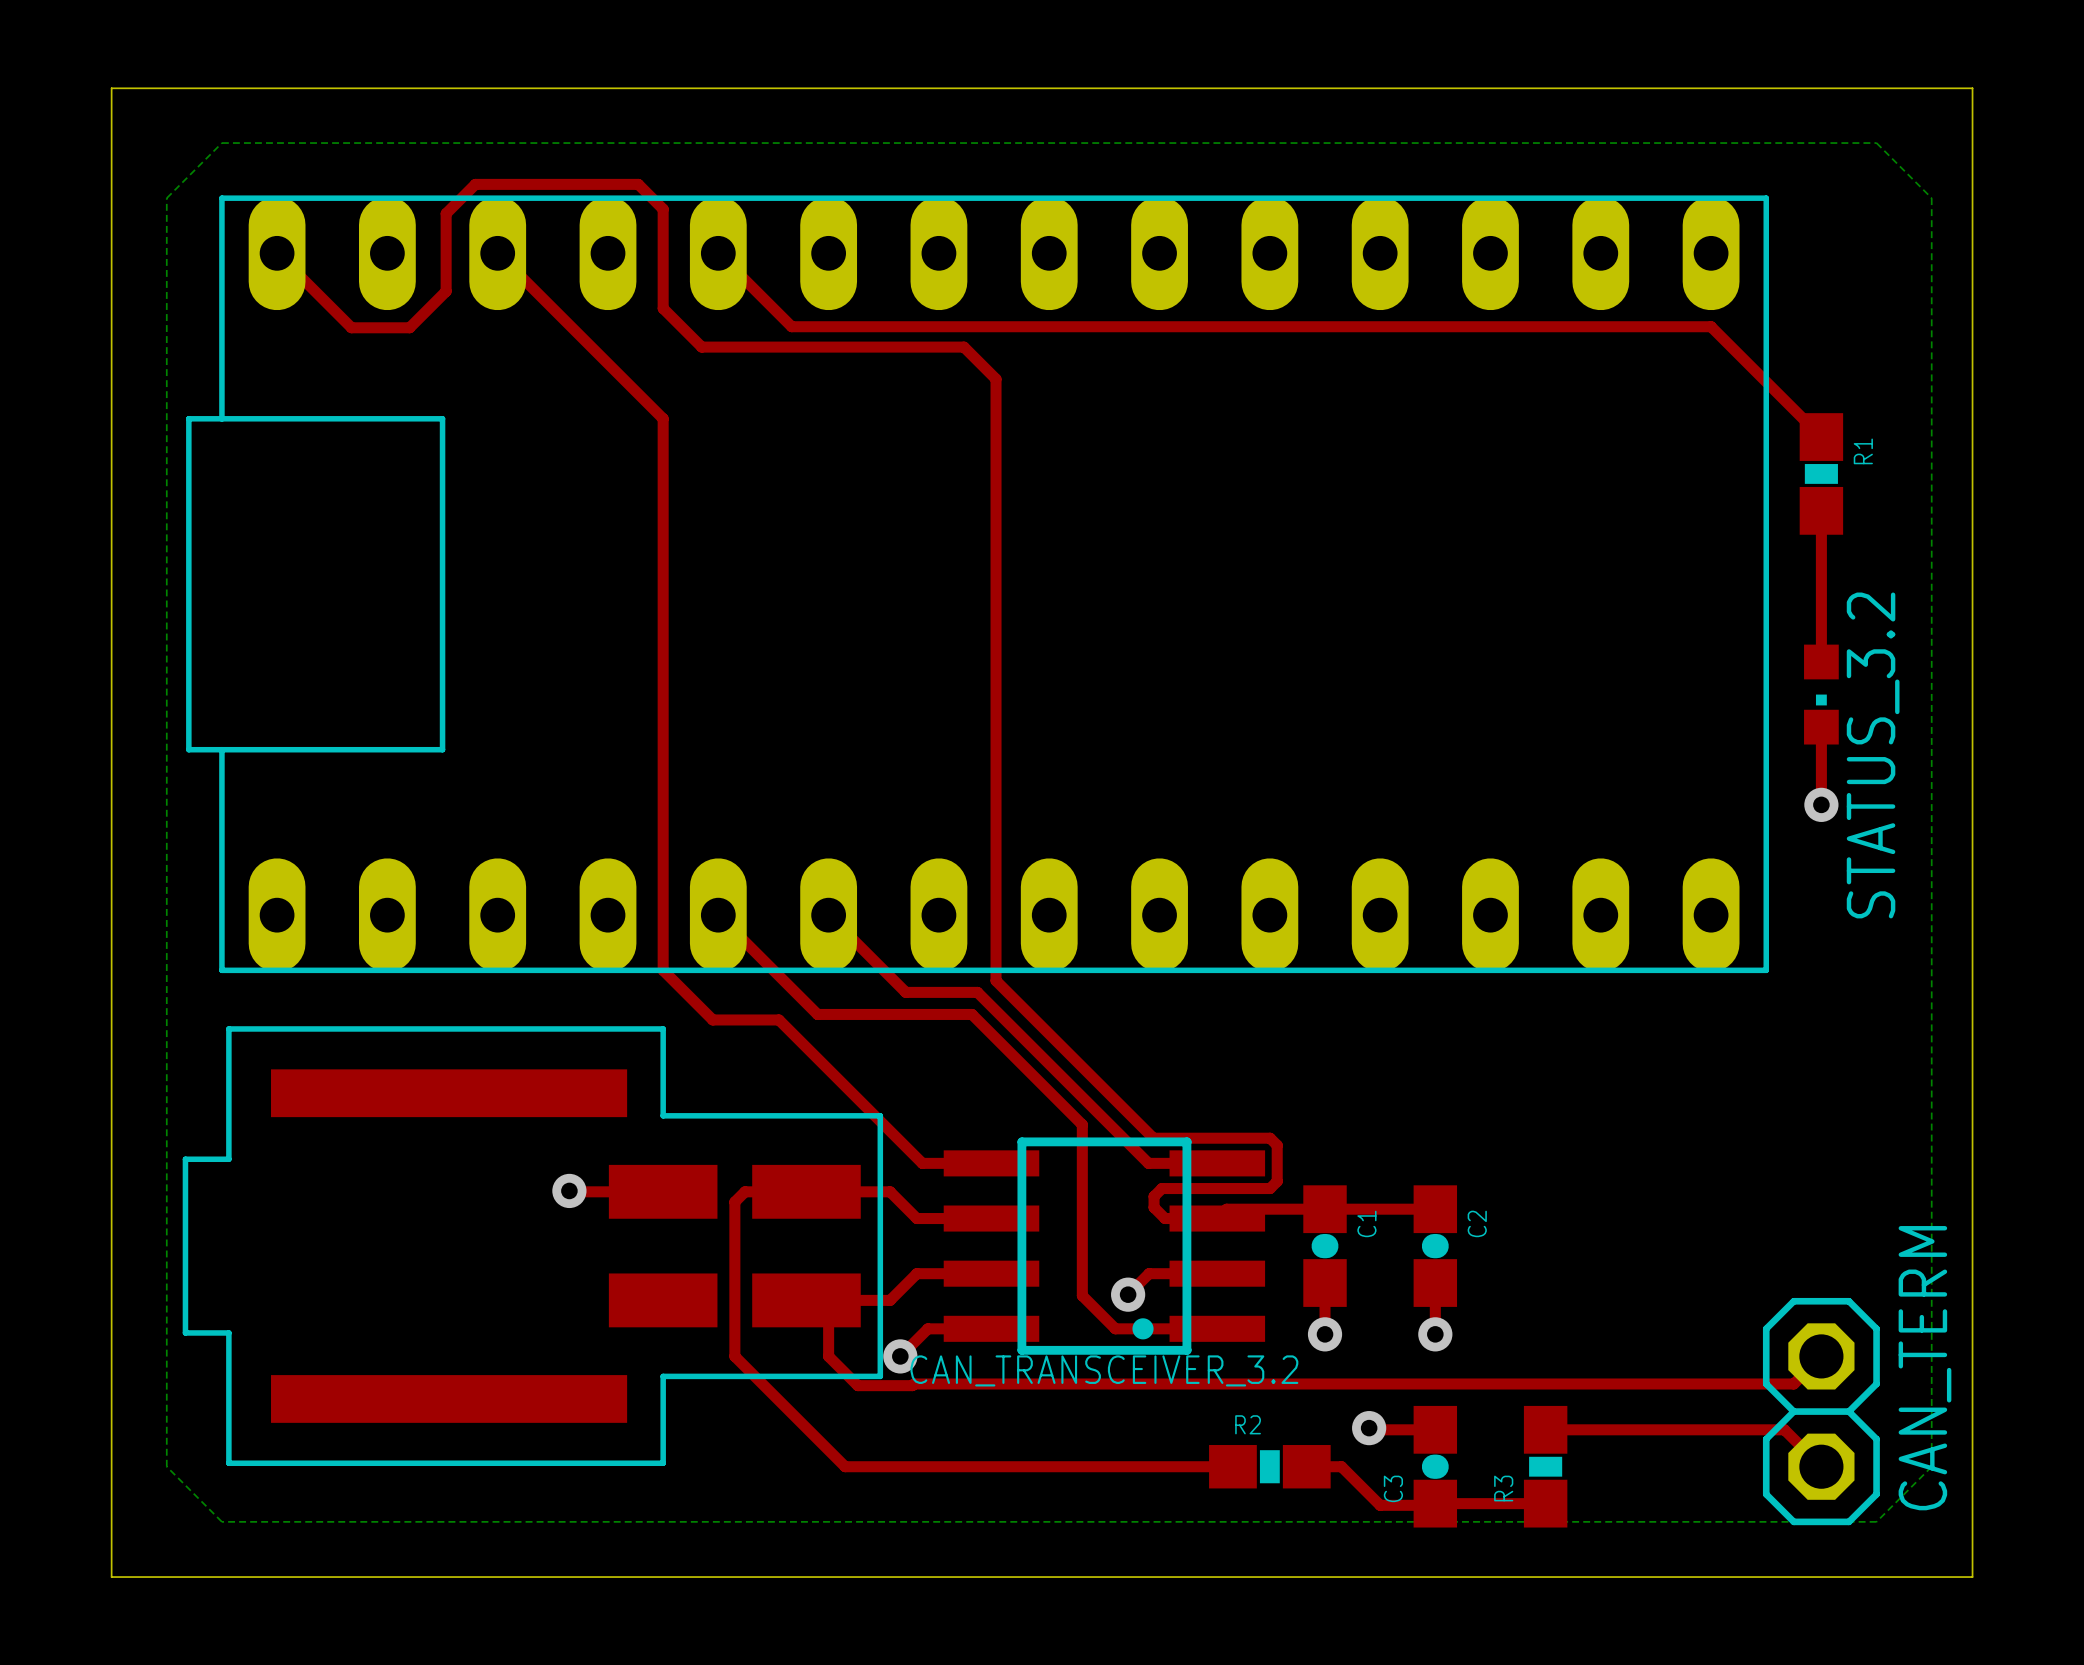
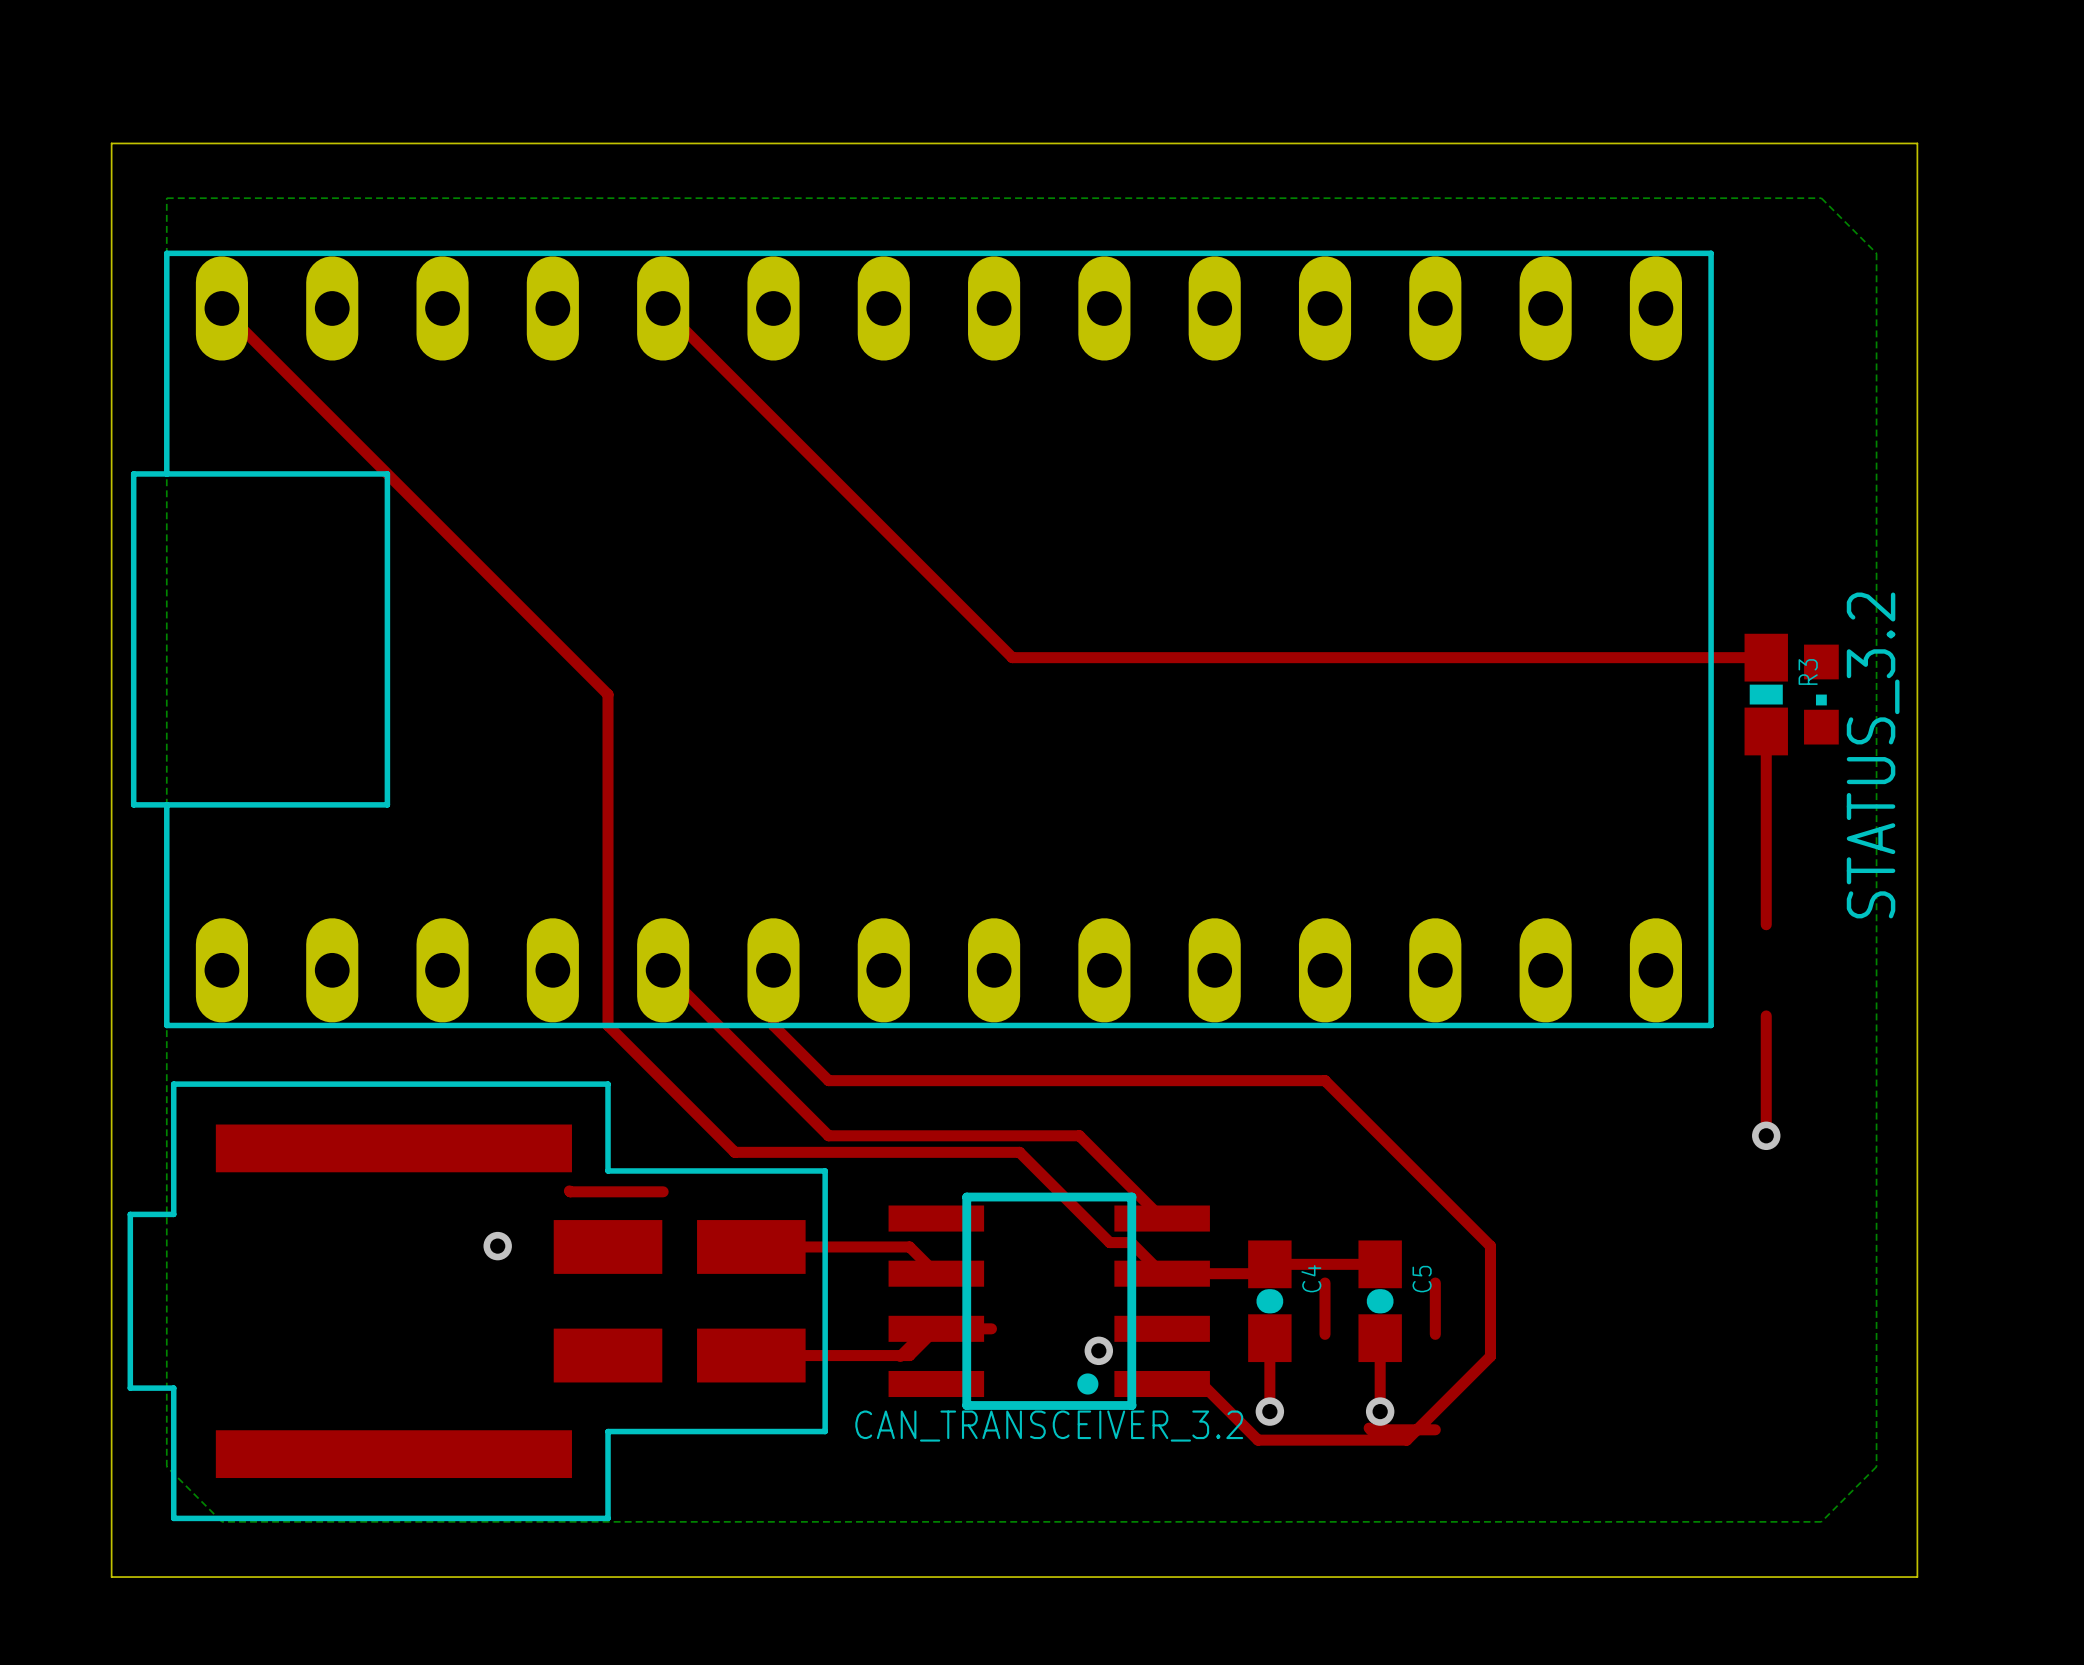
board edge: (111, 143) (111, 88) (1972, 88) (1972, 1577) (1917, 1577) -> (111, 143) (1917, 143) (1917, 1577)
bottom zone outline: (166, 198) (221, 143) (1876, 143) (1931, 198) (1931, 1466) (1876, 1521) (1821, 1521) -> (166, 198) (1821, 198) (1876, 253) (1876, 1466) (1821, 1521)
top track: (277, 253) (351, 327) (409, 327) (446, 291) (446, 213) (475, 184) (638, 184) (663, 209) (663, 308) -> none
top track: (497, 253) (663, 418) (663, 970) -> none
top track: (718, 253) (791, 326) (1711, 326) (1821, 437) -> none
top track: (701, 347) (964, 347) (996, 379) (996, 980) (1153, 1138) (1270, 1138) (1277, 1145) (1277, 1181) (1270, 1188) (1161, 1188) (1154, 1196) (1154, 1207) (1165, 1218) (1217, 1218) (1226, 1209) (1435, 1209) -> (701, 347) (1012, 657) (1766, 657)
R1: (1821, 473) -> none
top track: (1821, 510) (1821, 661) -> none
part: (977, 584) -> none
part: none -> (922, 639)
top track: (1821, 727) (1821, 804) -> none
top track: none -> (1766, 731) (1766, 924)
via: (1821, 804) -> none
top track: (718, 915) (817, 1014) (972, 1014) (1082, 1124) (1082, 1295) (1115, 1328) (1217, 1328) -> none
top track: (828, 915) (905, 992) (977, 992) (1148, 1163) (1217, 1163) -> none
top track: none -> (1766, 1015) (1766, 1135)
top track: (712, 1019) (778, 1019) (922, 1163) (991, 1163) -> (712, 1019) (828, 1135) (1079, 1135) (1162, 1218)
via: none -> (1766, 1135)
via: (569, 1190) -> none
top track: (991, 1218) (916, 1218) (890, 1191) (745, 1191) (734, 1201) (734, 1356) (845, 1466) (1232, 1466) -> none
via: none -> (497, 1246)
part position: (532, 1246) -> (477, 1301)
top track: none -> (751, 1246) (909, 1246) (936, 1273)
CAN_TRANSCEIVER_3.2 position: (1104, 1246) -> (1049, 1301)
C1: (1325, 1246) -> none
C2: (1435, 1246) -> none
top track: none -> (1380, 1264) (1269, 1264) (1260, 1273) (1217, 1273)
top track: (991, 1273) (916, 1273) (890, 1300) (806, 1300) (828, 1322) (828, 1356) (857, 1385) (1162, 1383) -> none
top track: (1162, 1273) (1149, 1273) (1128, 1294) -> (1162, 1273) (1131, 1242) (1109, 1242) (1019, 1152) (734, 1152) (608, 1025) (608, 694) (221, 308)
via: (1128, 1294) -> none
C4: none -> (1269, 1301)
C5: none -> (1380, 1301)
top track: none -> (936, 1328) (909, 1355) (751, 1355)
via: (1325, 1334) -> none
via: (1435, 1334) -> none
top track: none -> (1269, 1338) (1269, 1411)
top track: none -> (1380, 1338) (1380, 1411)
via: none -> (1098, 1350)
via: (900, 1356) -> none
top track: (1821, 1356) (1793, 1383) (1201, 1383) -> (773, 970) (773, 1025) (828, 1080) (1325, 1080) (1490, 1246) (1490, 1356) (1406, 1440) (1258, 1440) (1201, 1383)
via: none -> (1269, 1411)
CAN_TERM: (1821, 1411) -> none
via position: (1369, 1428) -> (1380, 1411)
top track: (1545, 1429) (1784, 1429) (1821, 1466) -> none
R2: (1269, 1466) -> none
top track: (1306, 1466) (1341, 1466) (1380, 1505) (1545, 1503) -> none
C3: (1435, 1466) -> none
R3 position: (1545, 1466) -> (1766, 694)
R3 name position: R3 (1503, 1488) -> R3 (1808, 672)

